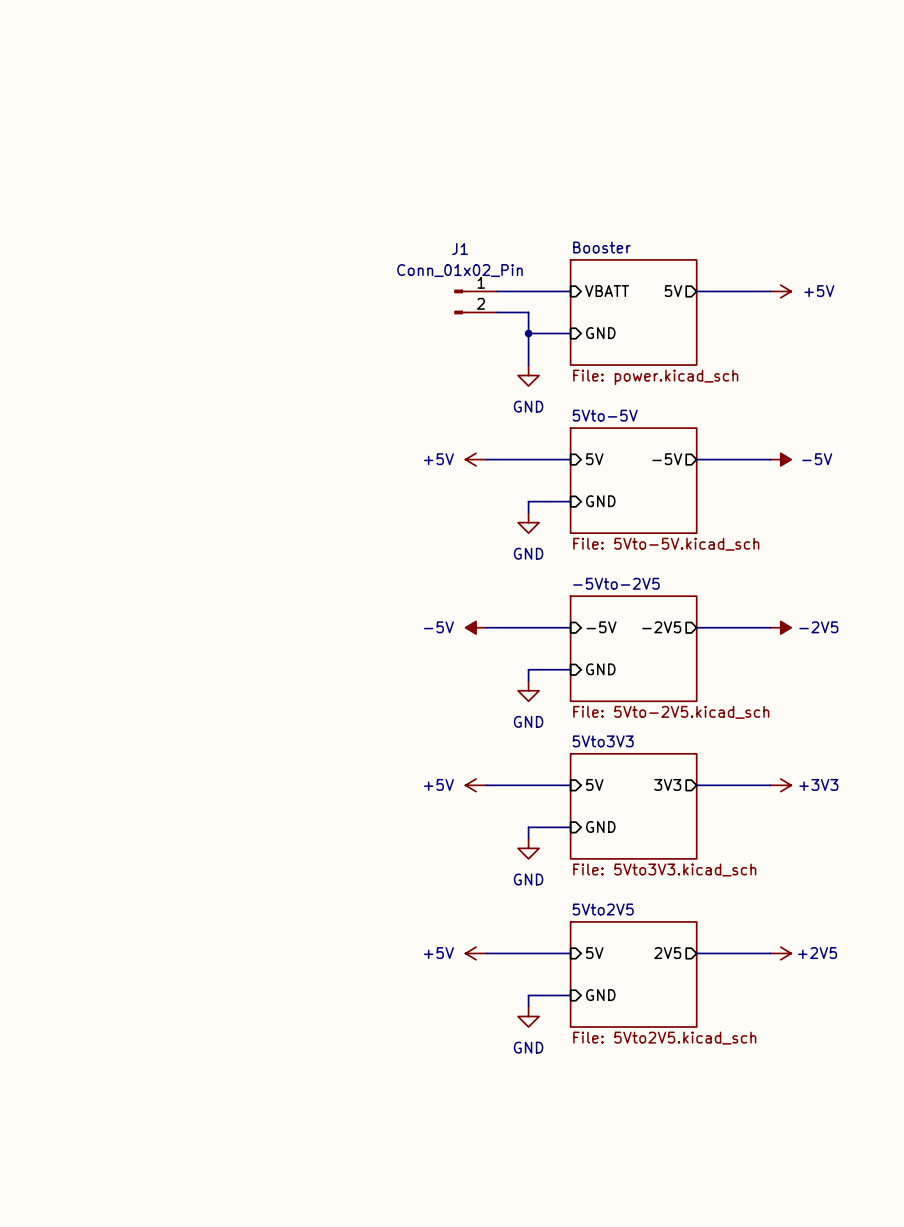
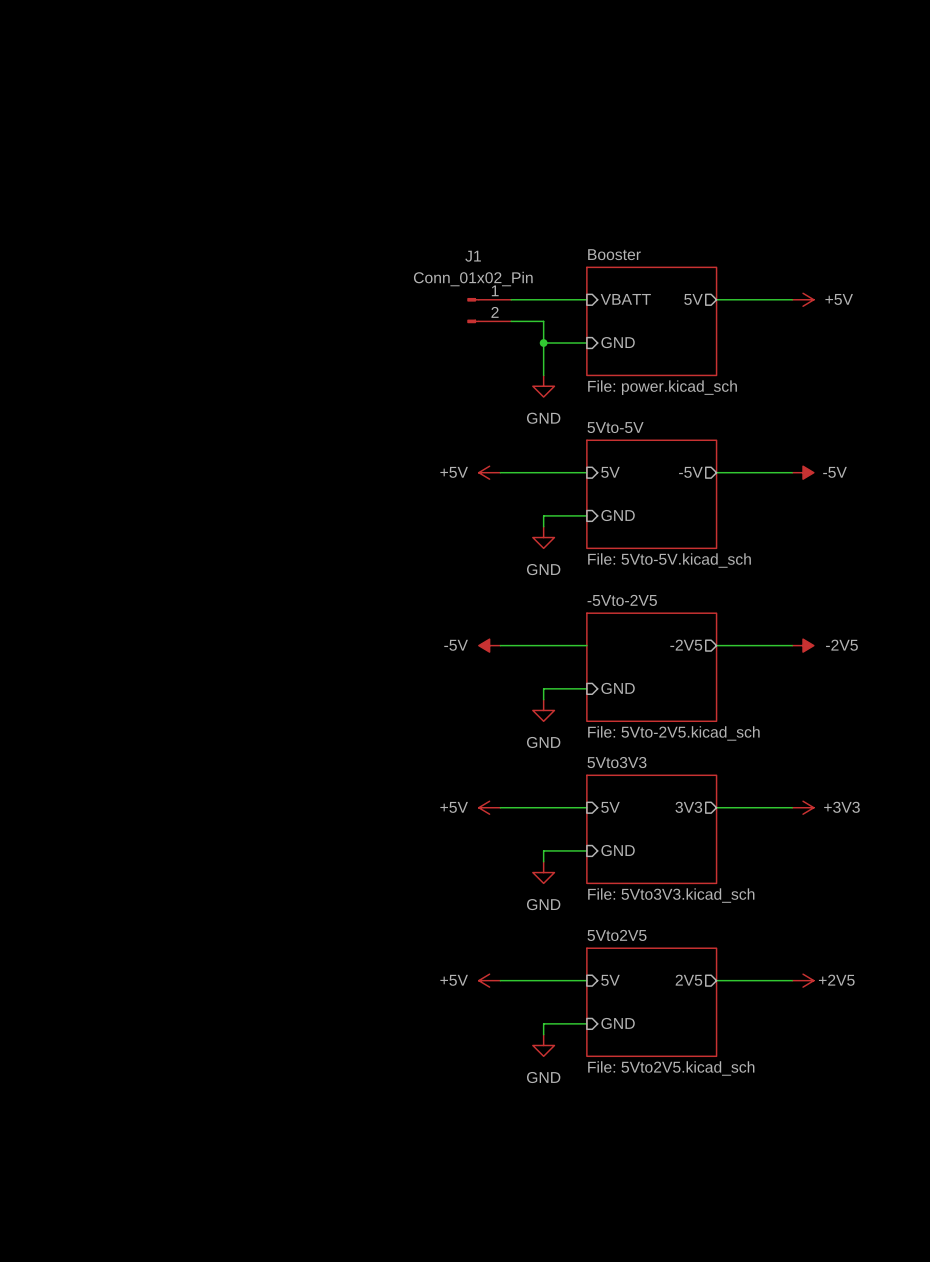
sheet pin: -5V (601, 627) -> none

